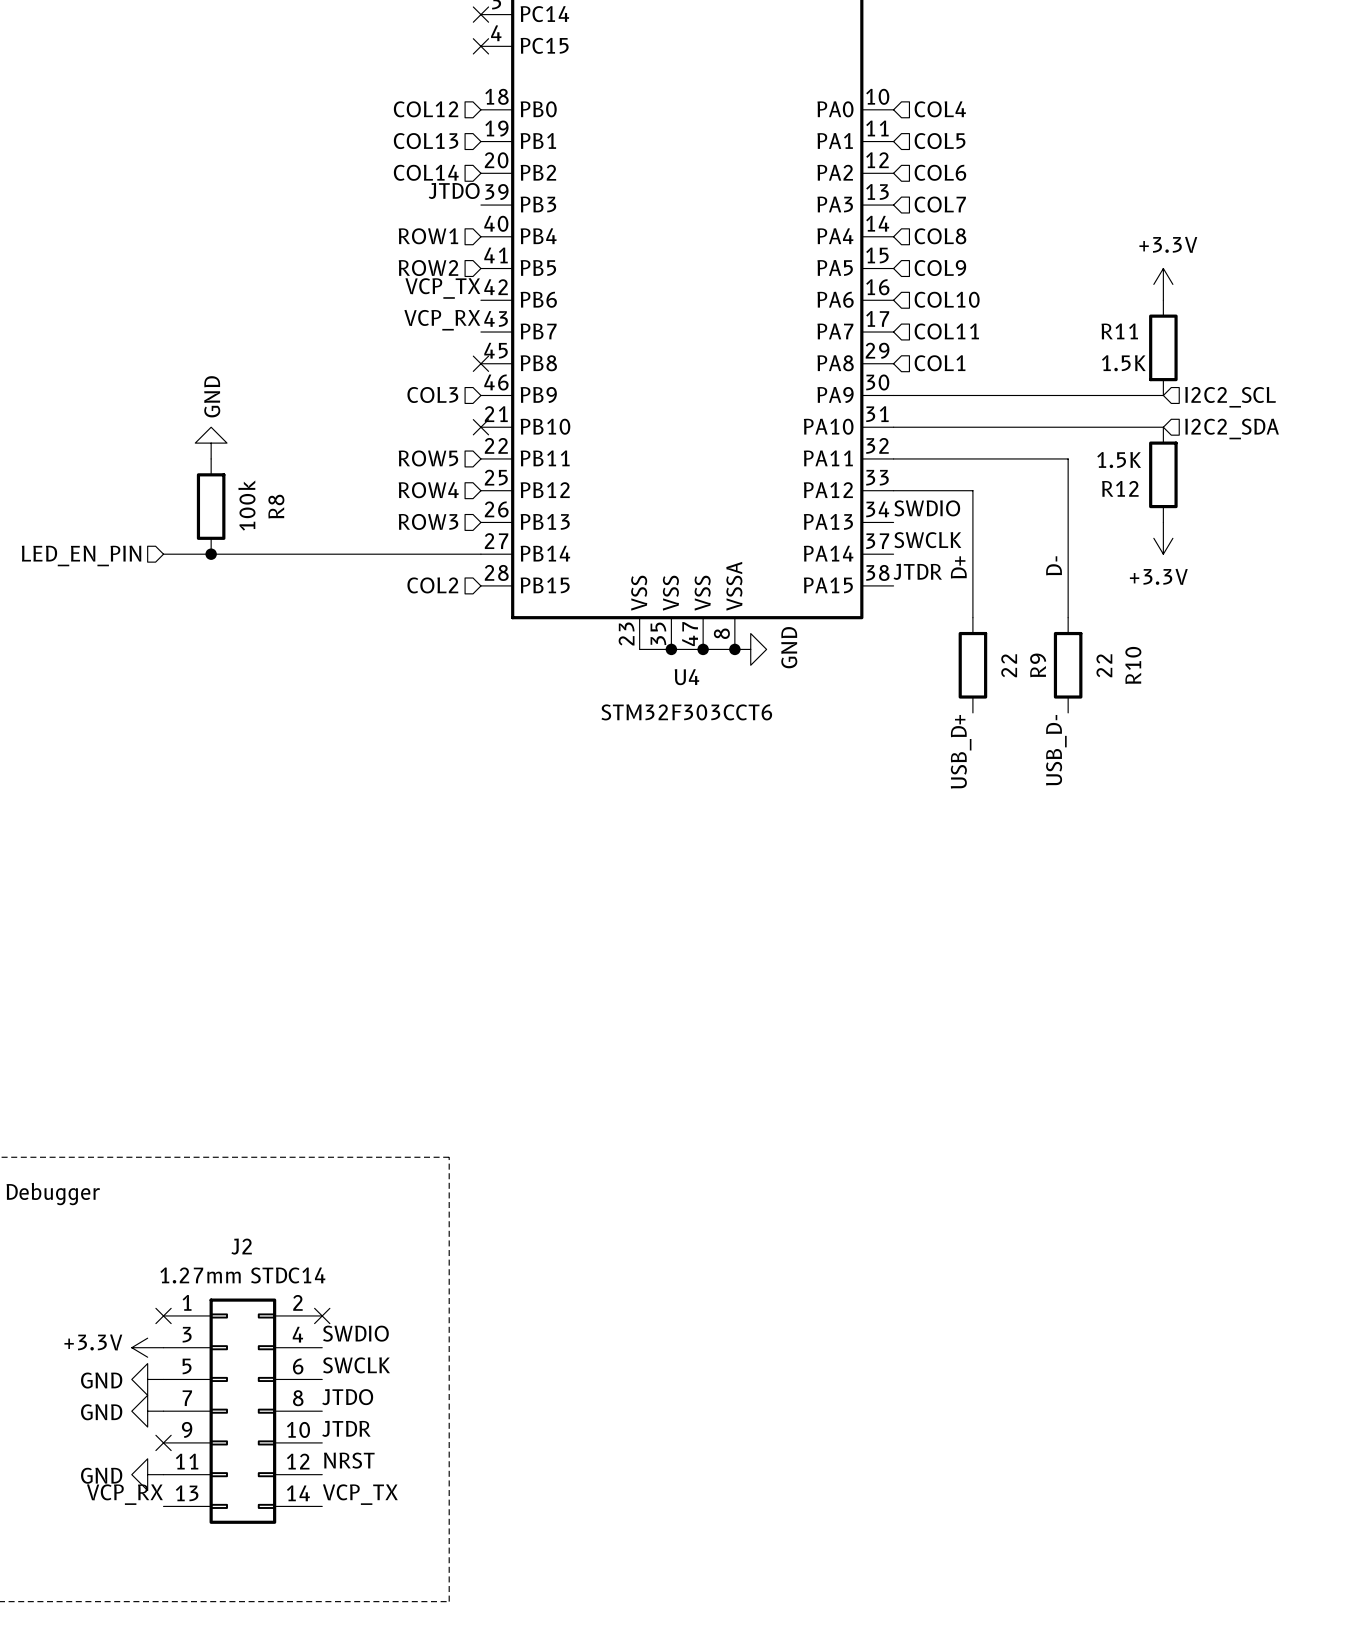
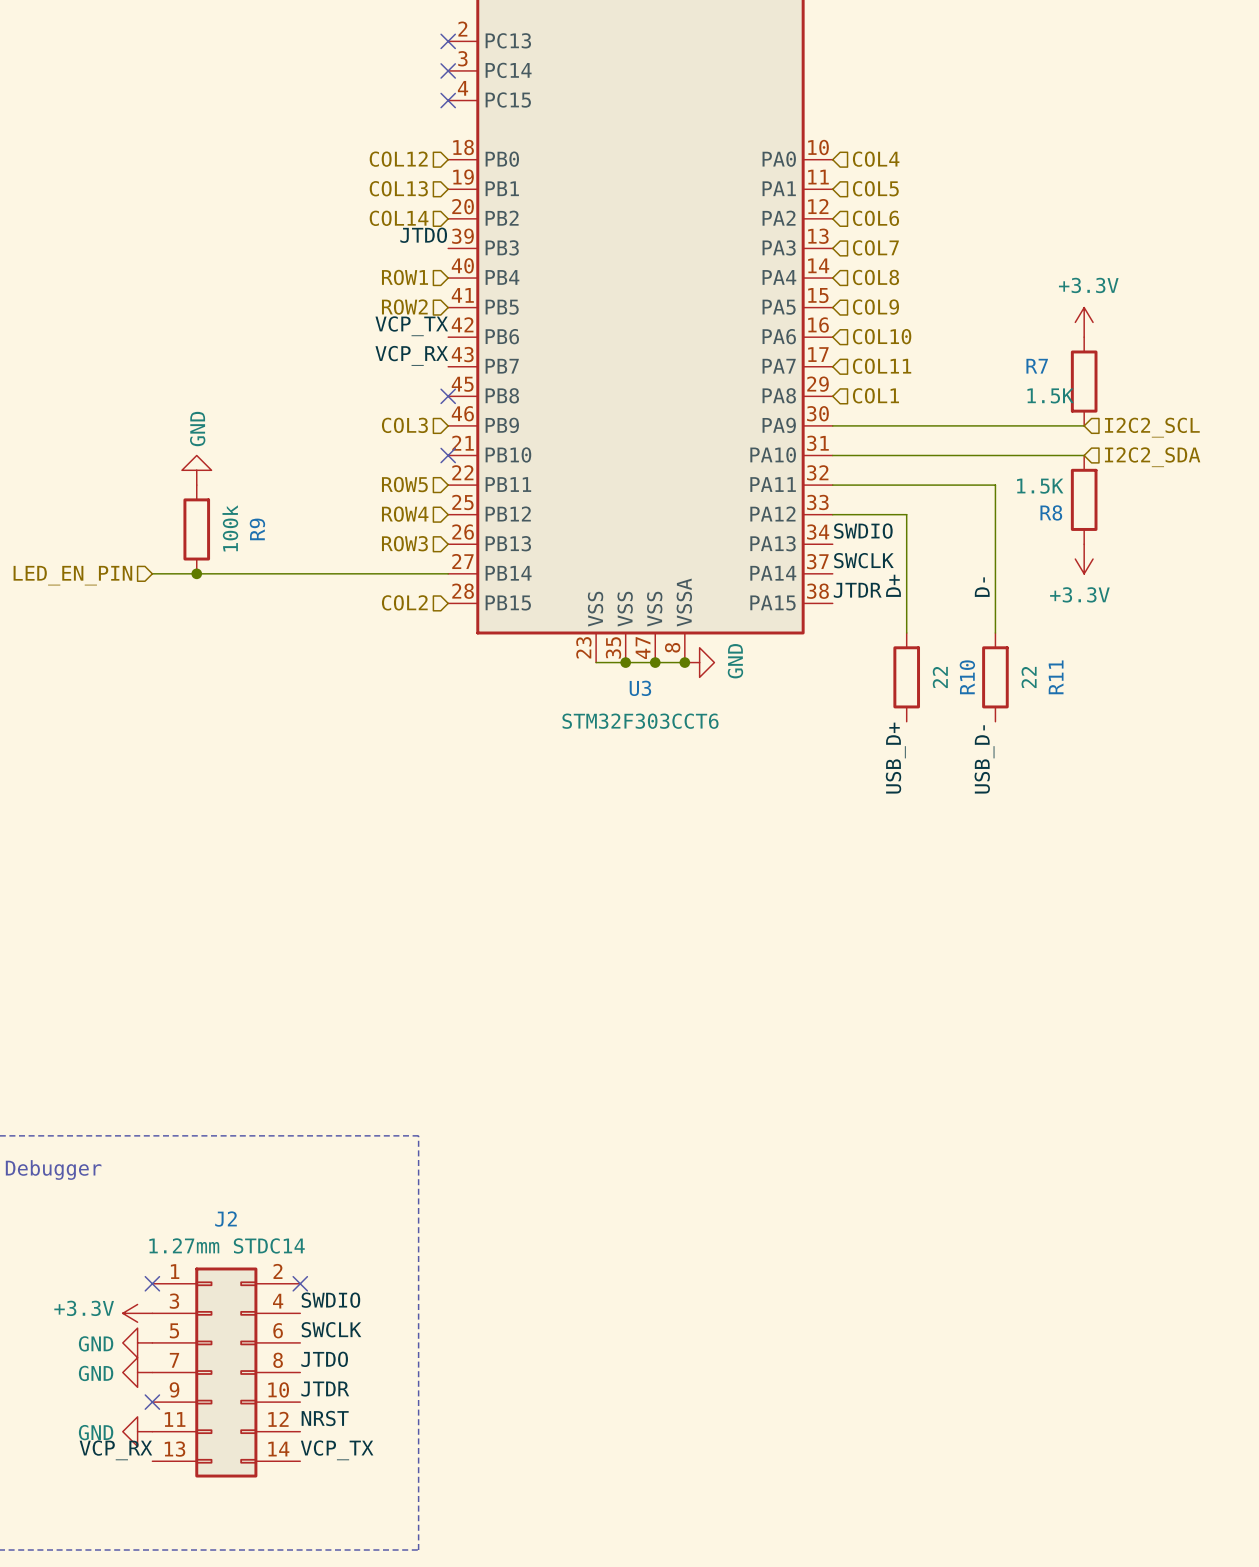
R11 name: R11 (1119, 331) -> R7 (1037, 366)
R12 name: R12 (1120, 488) -> R8 (1051, 512)
R8 name: R8 (276, 506) -> R9 (257, 529)
R9 name: R9 (1038, 665) -> R10 (967, 677)
R10 name: R10 (1133, 665) -> R11 (1056, 677)
U4 name: U4 (686, 677) -> U3 (640, 688)

